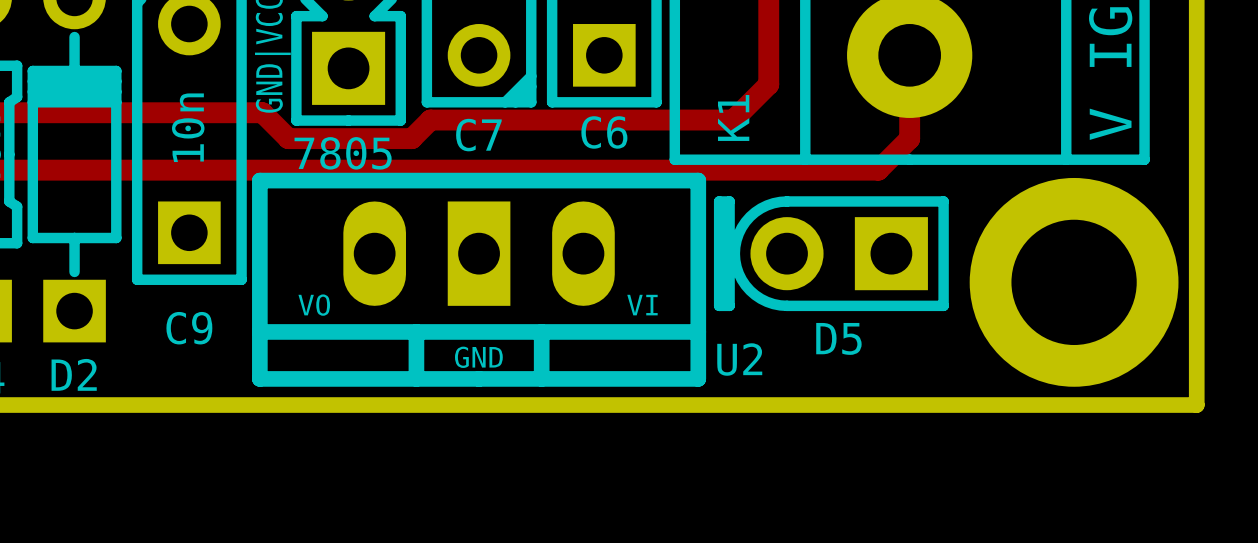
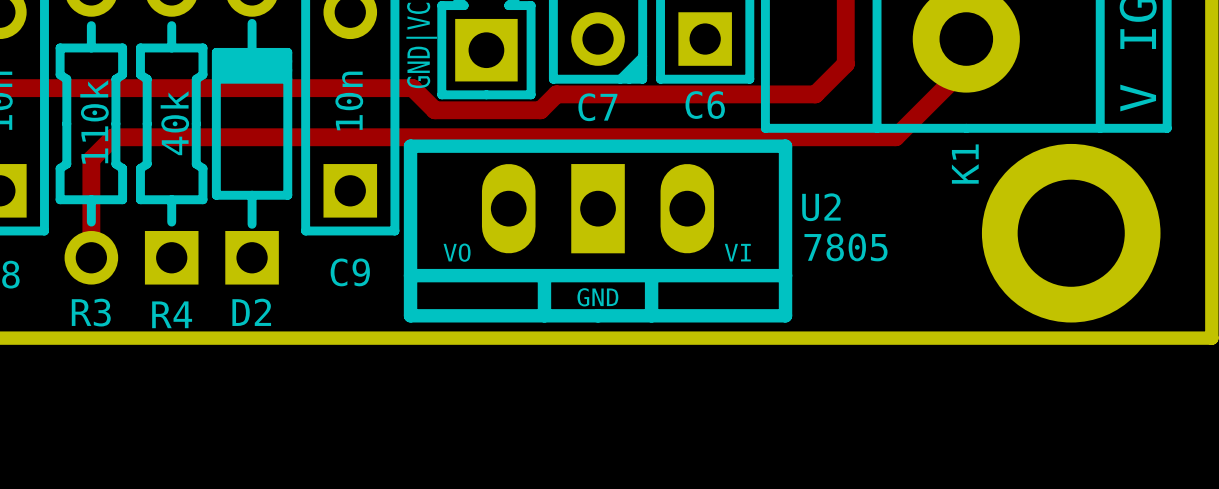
track: (909, 87) (909, 138) (878, 170) (827, 170) -> (966, 66) (895, 137)
K1 name position: K1 (733, 117) -> K1 (965, 164)
U2 value position: 7805 (343, 153) -> 7805 (846, 247)
D5: (831, 253) -> none
part position: (1074, 282) -> (1071, 233)
U2 name position: U2 (739, 359) -> U2 (821, 207)

